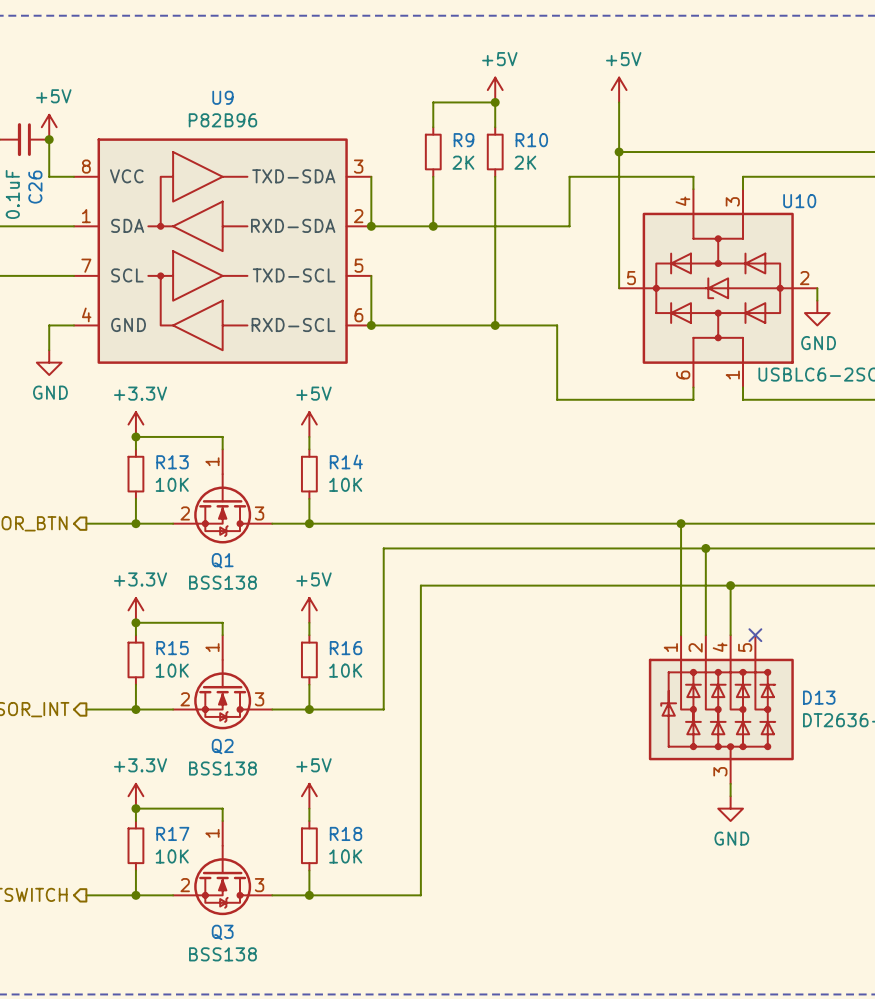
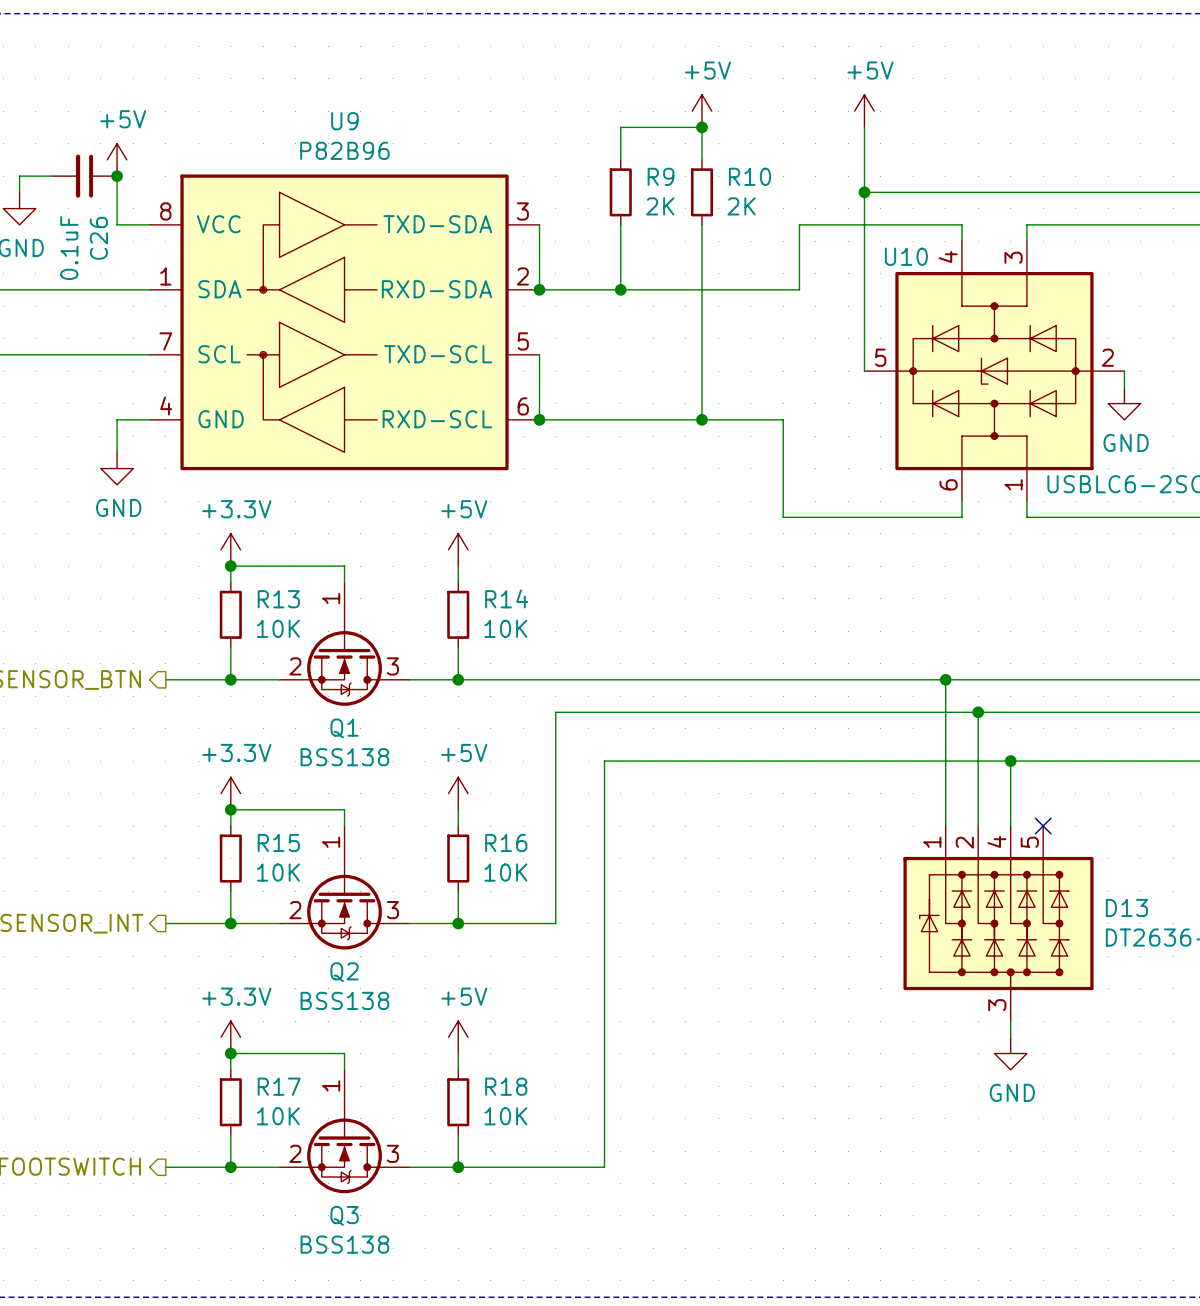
U10 name position: U10 (799, 201) -> U10 (906, 256)

